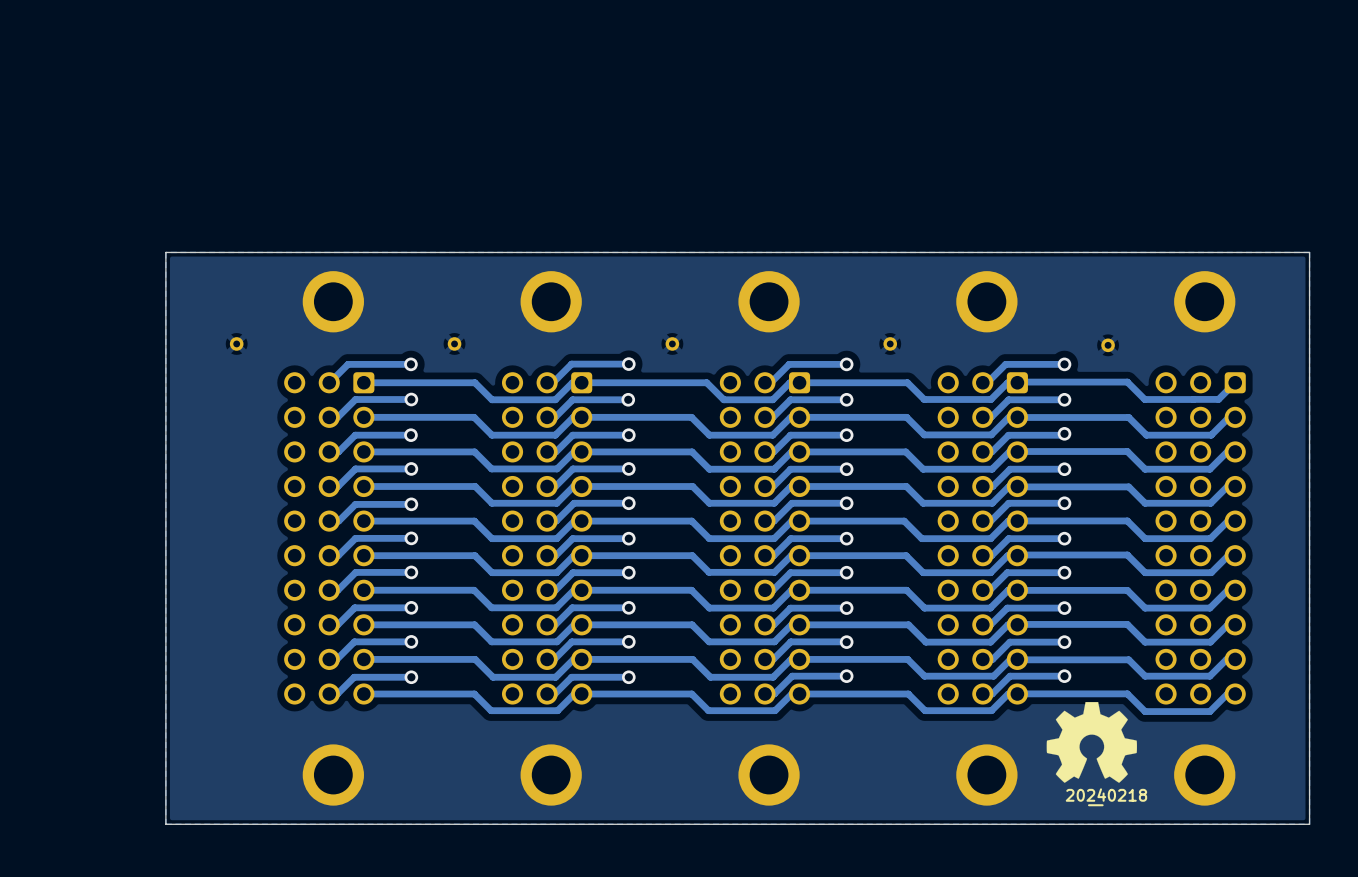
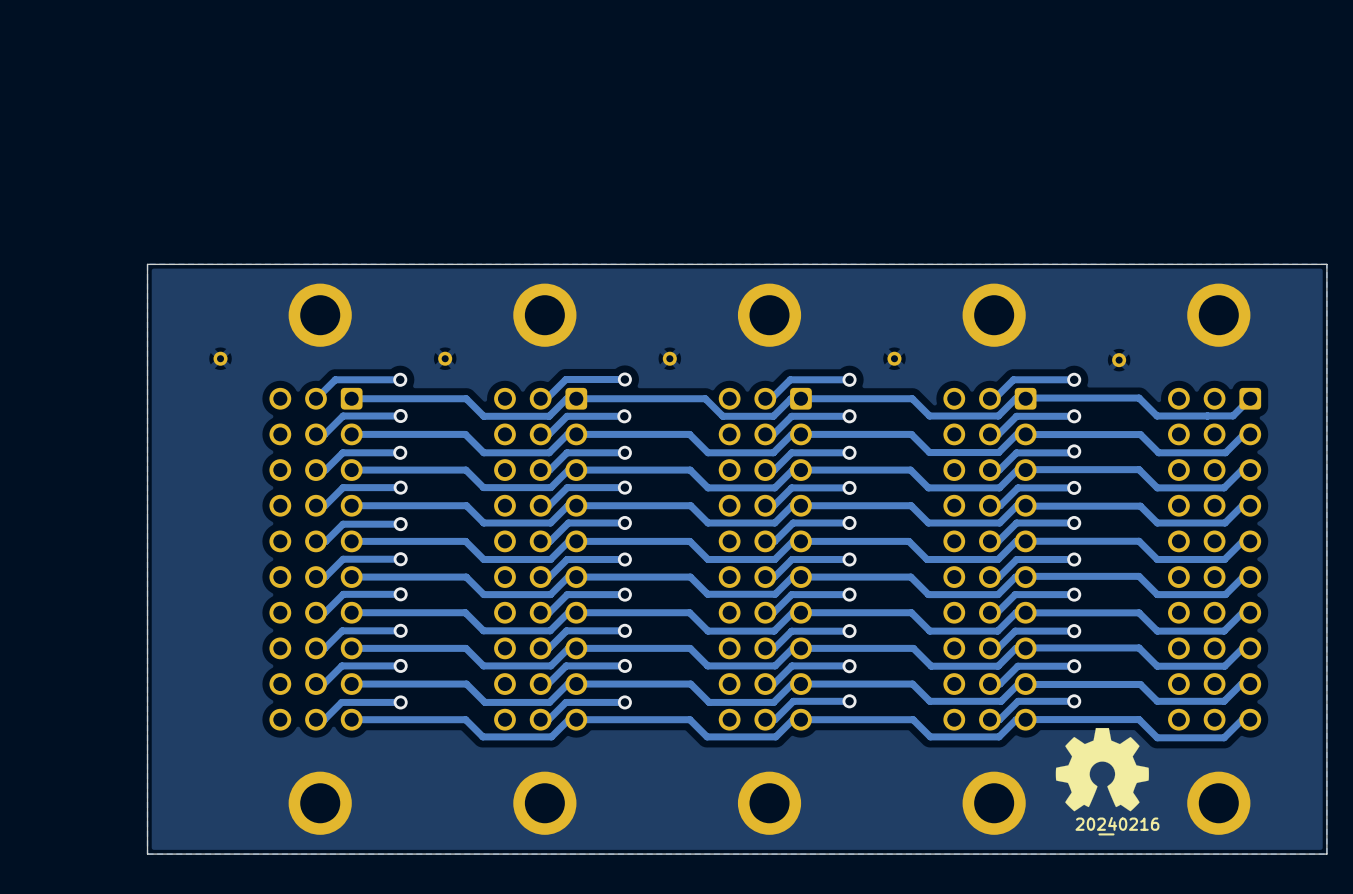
drawing shape: [1065, 788, 1148, 807] -> [1075, 816, 1160, 836]

